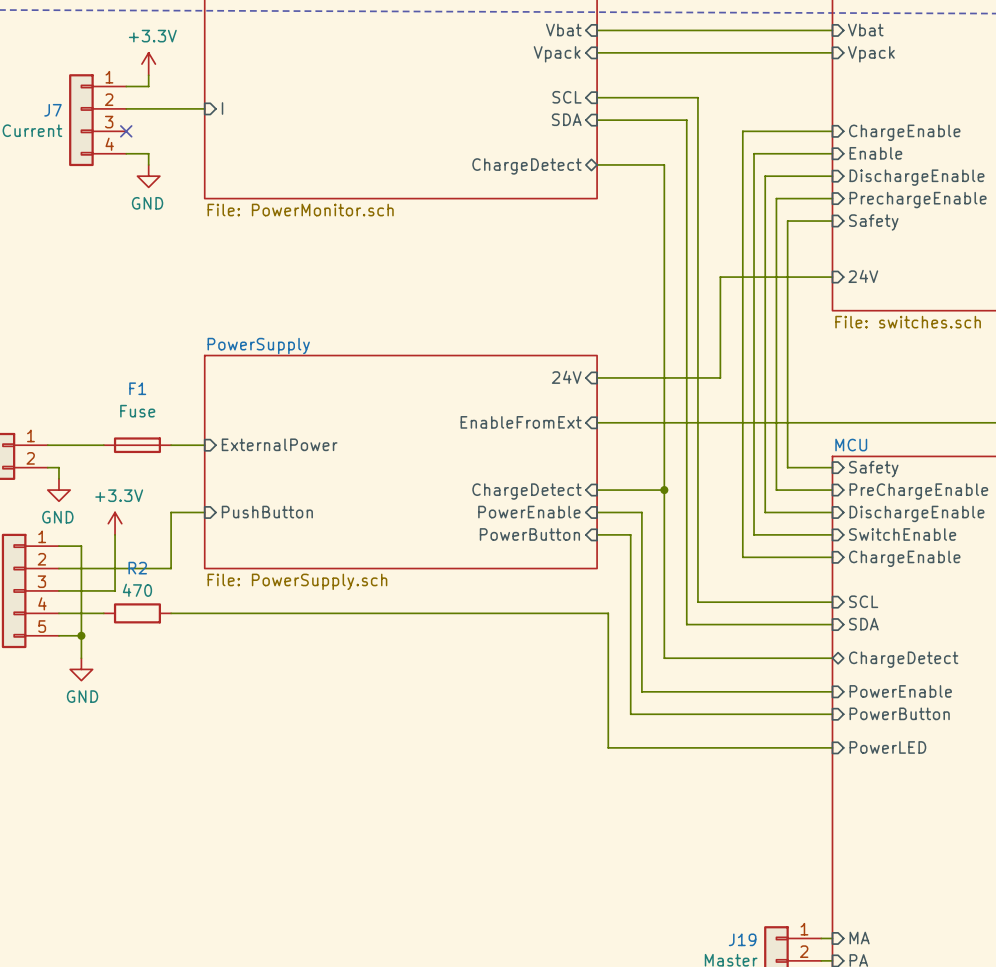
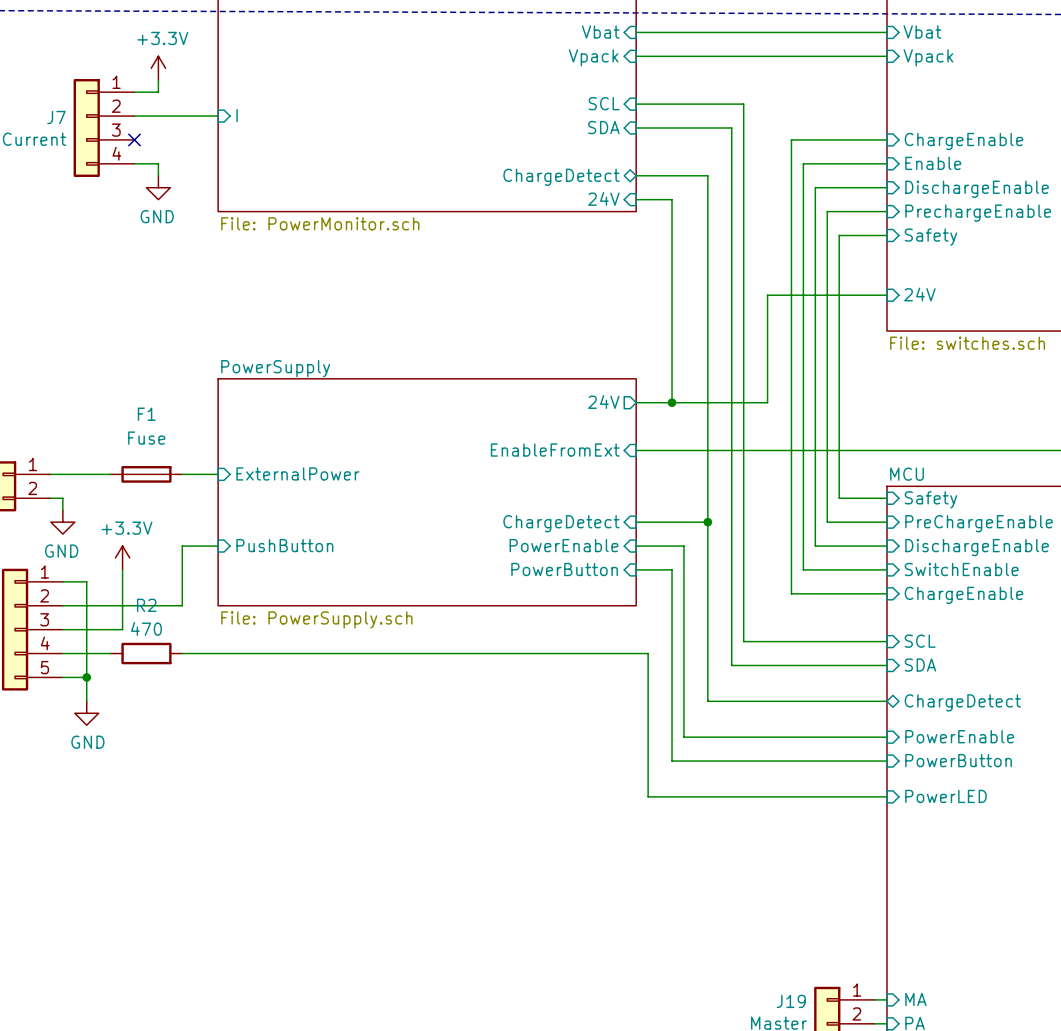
sheet pin: none -> 24V (603, 198)
wire: none -> (636, 199) (672, 199) (672, 402)
sheet pin shape: input (566, 377) -> output (603, 401)
junction: none -> (672, 402)

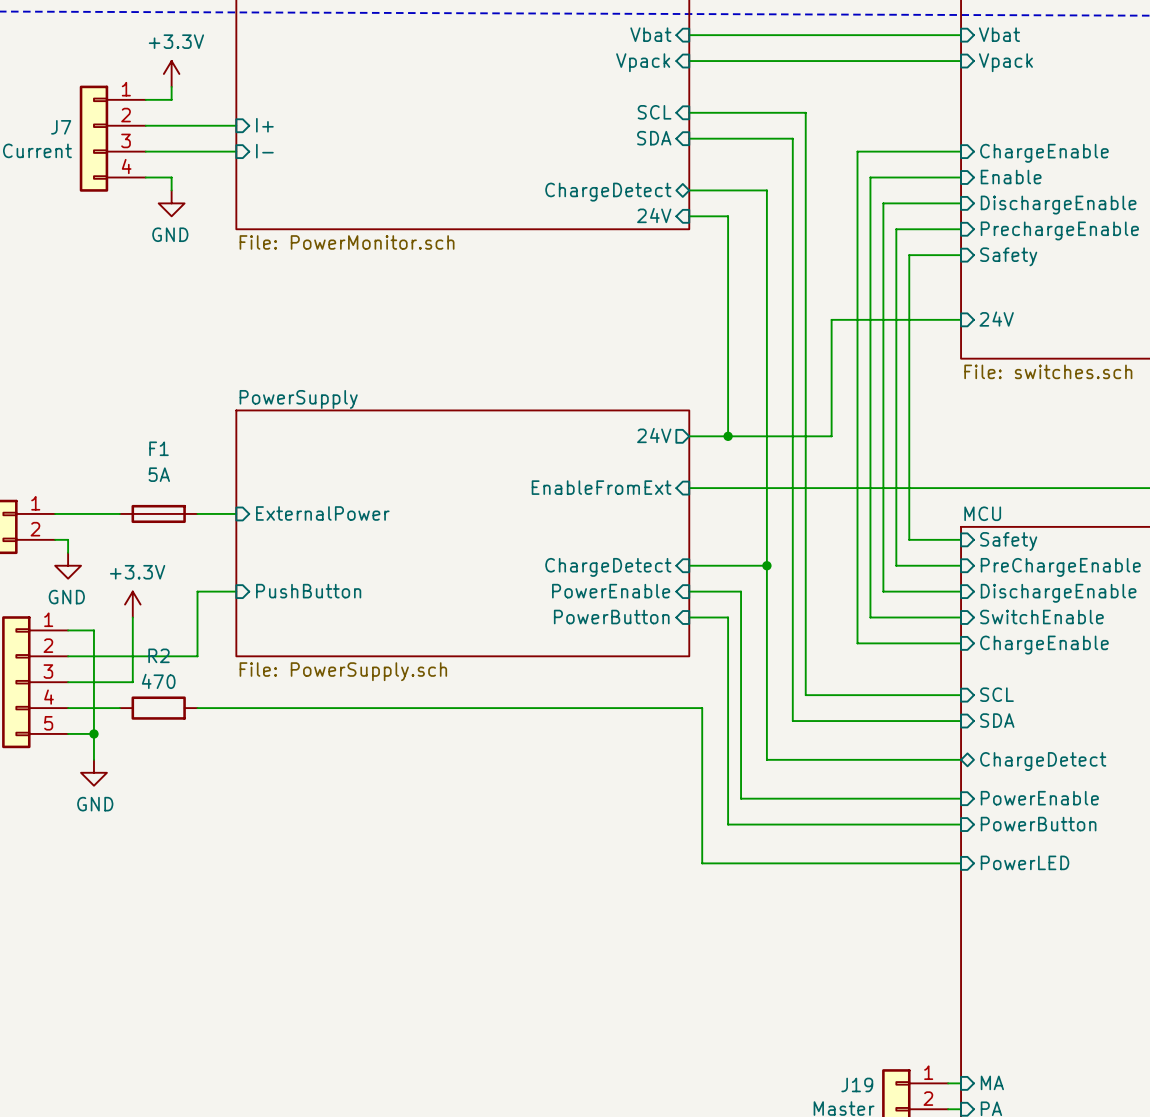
sheet pin: I (237, 115) -> I+ (264, 125)
wire: none -> (145, 151) (236, 151)
no-connect mark: (134, 139) -> none
sheet pin: none -> I- (264, 151)
F1 value: Fuse (146, 438) -> 5A (159, 474)

